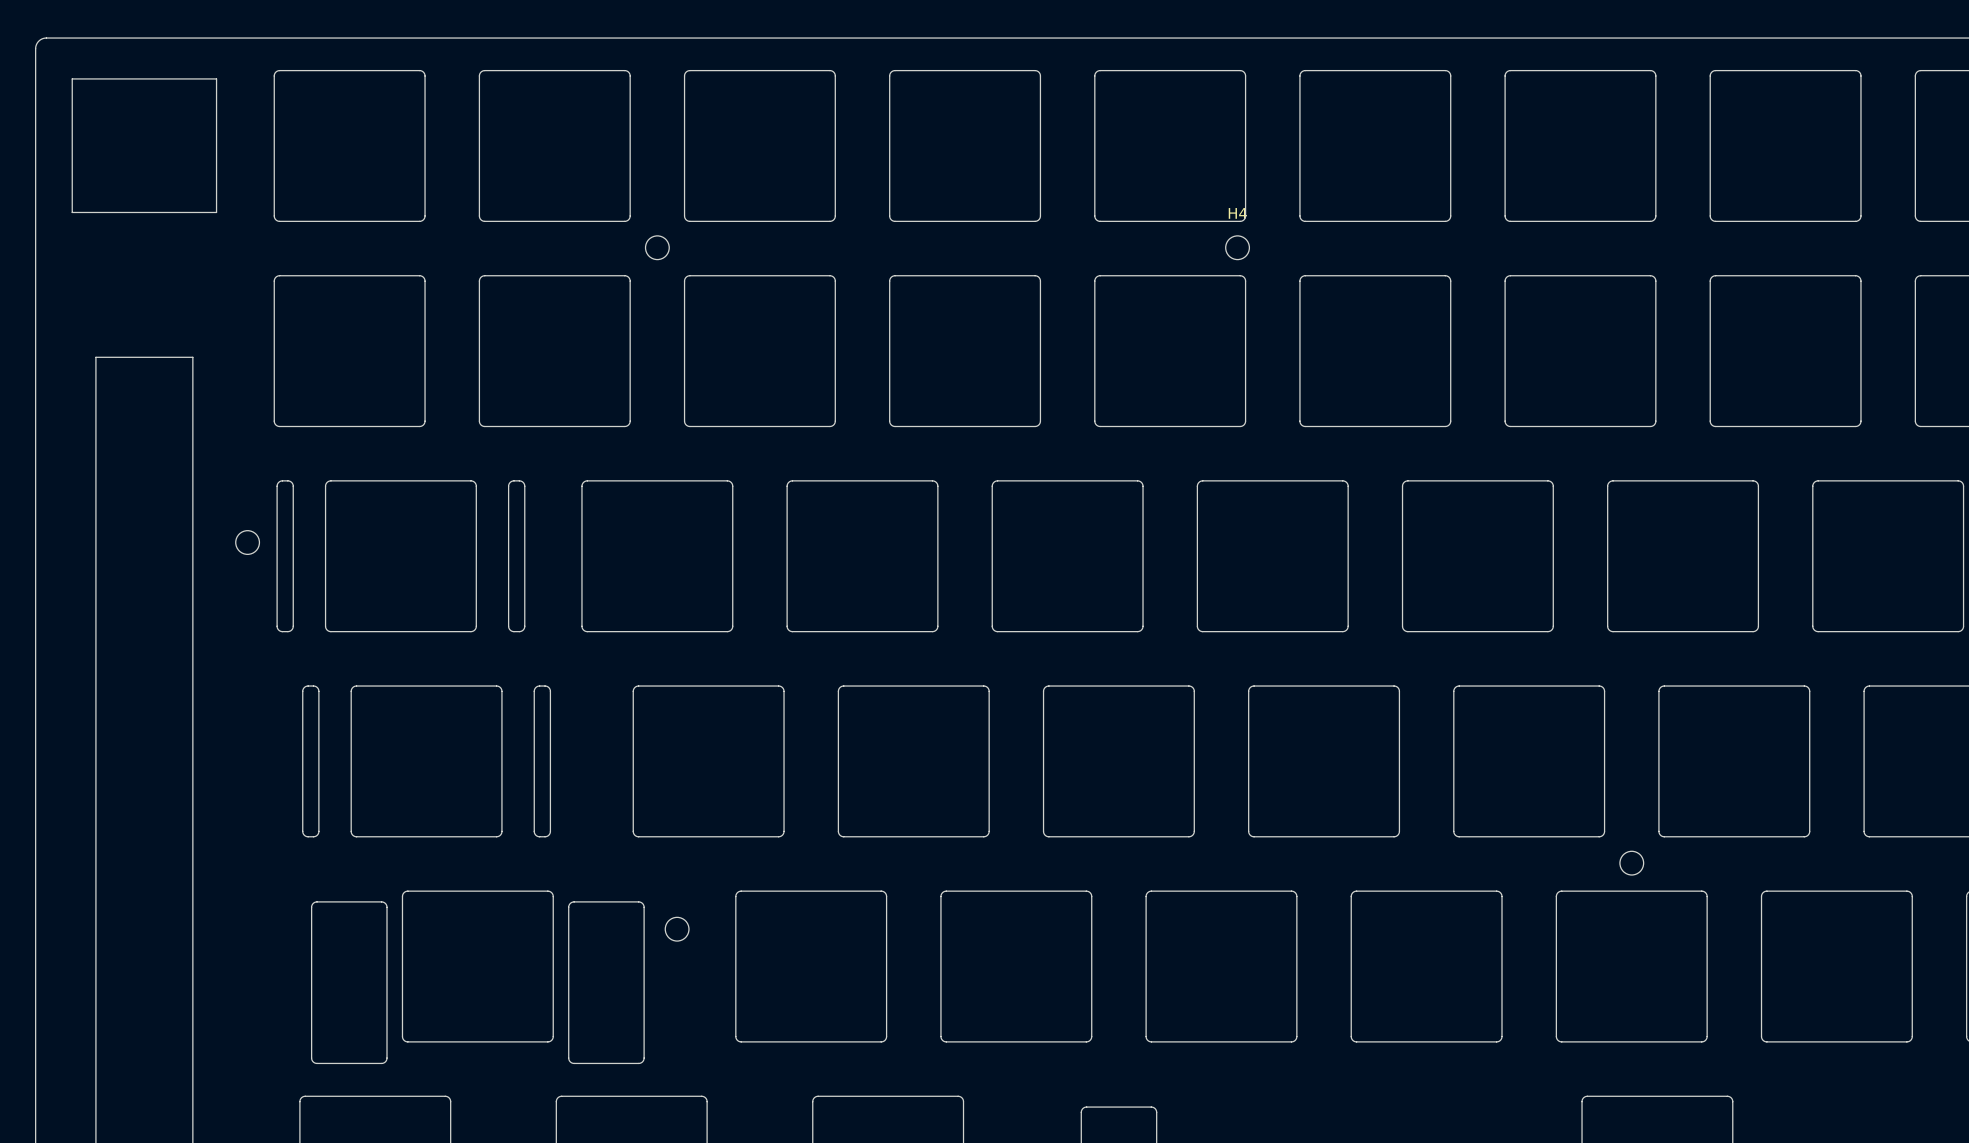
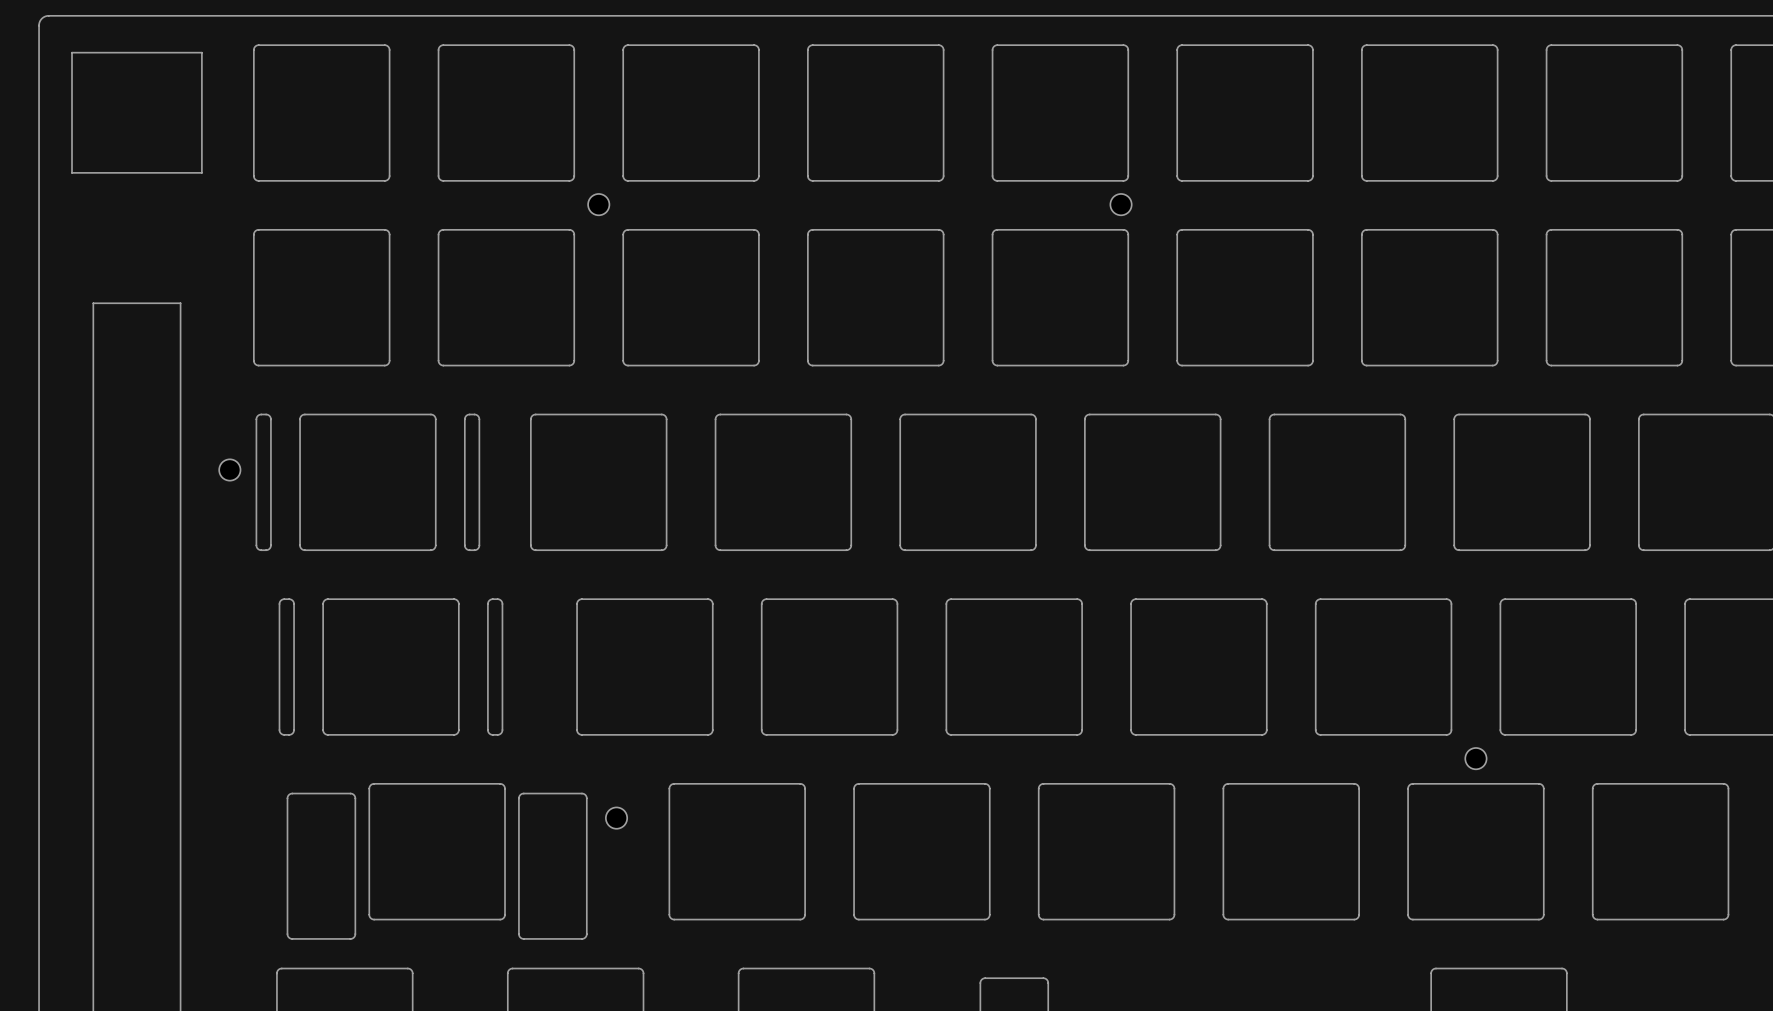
H4 name: H4 (1237, 213) -> none

